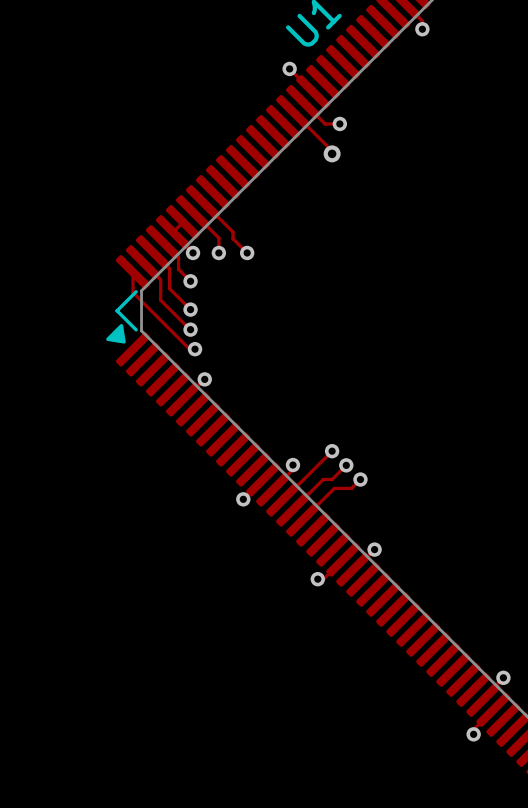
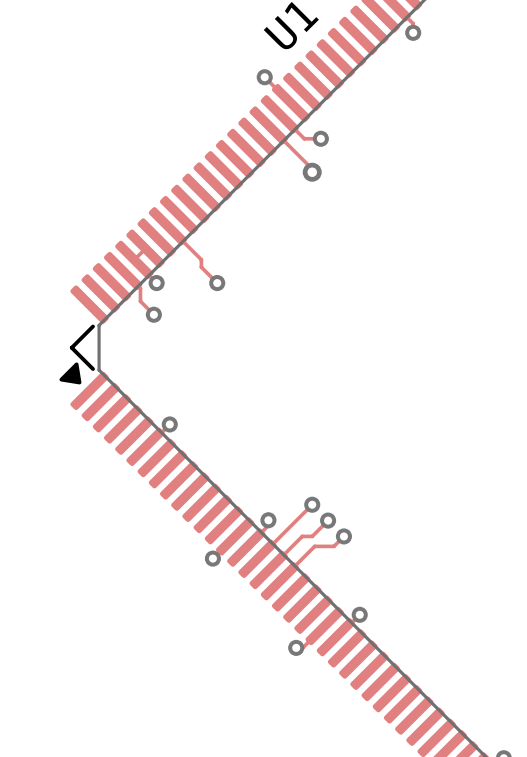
track: (193, 212) (218, 237) (218, 252) -> none
track: (153, 252) (169, 268) (169, 288) (190, 309) -> none
via: (218, 252) -> none
track: (143, 262) (160, 279) (160, 300) (190, 329) -> none
track: (133, 272) (133, 292) (189, 349) (195, 349) -> none
via: (190, 309) -> none
via: (190, 329) -> none
via: (195, 349) -> none

